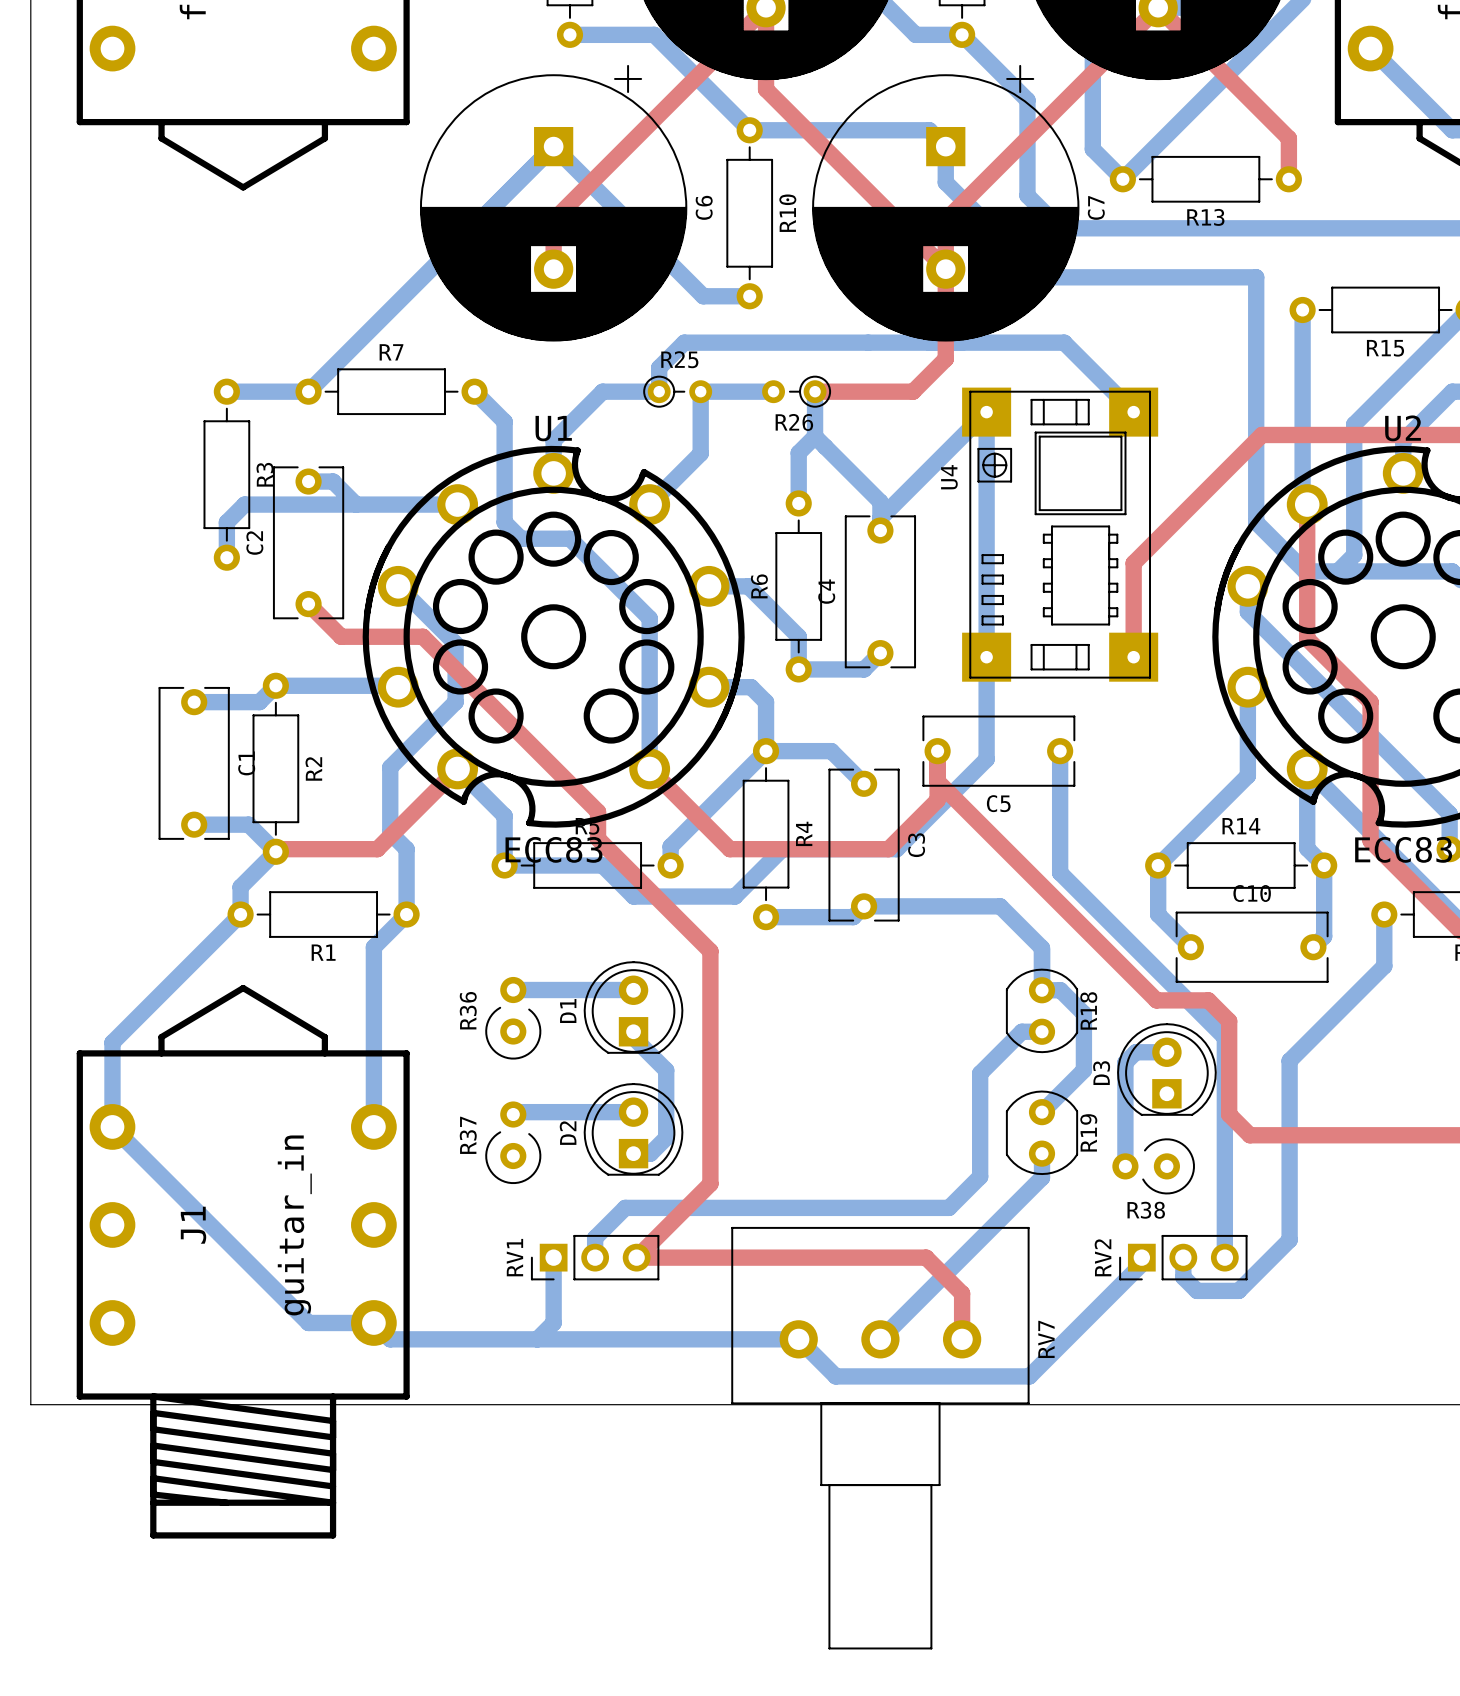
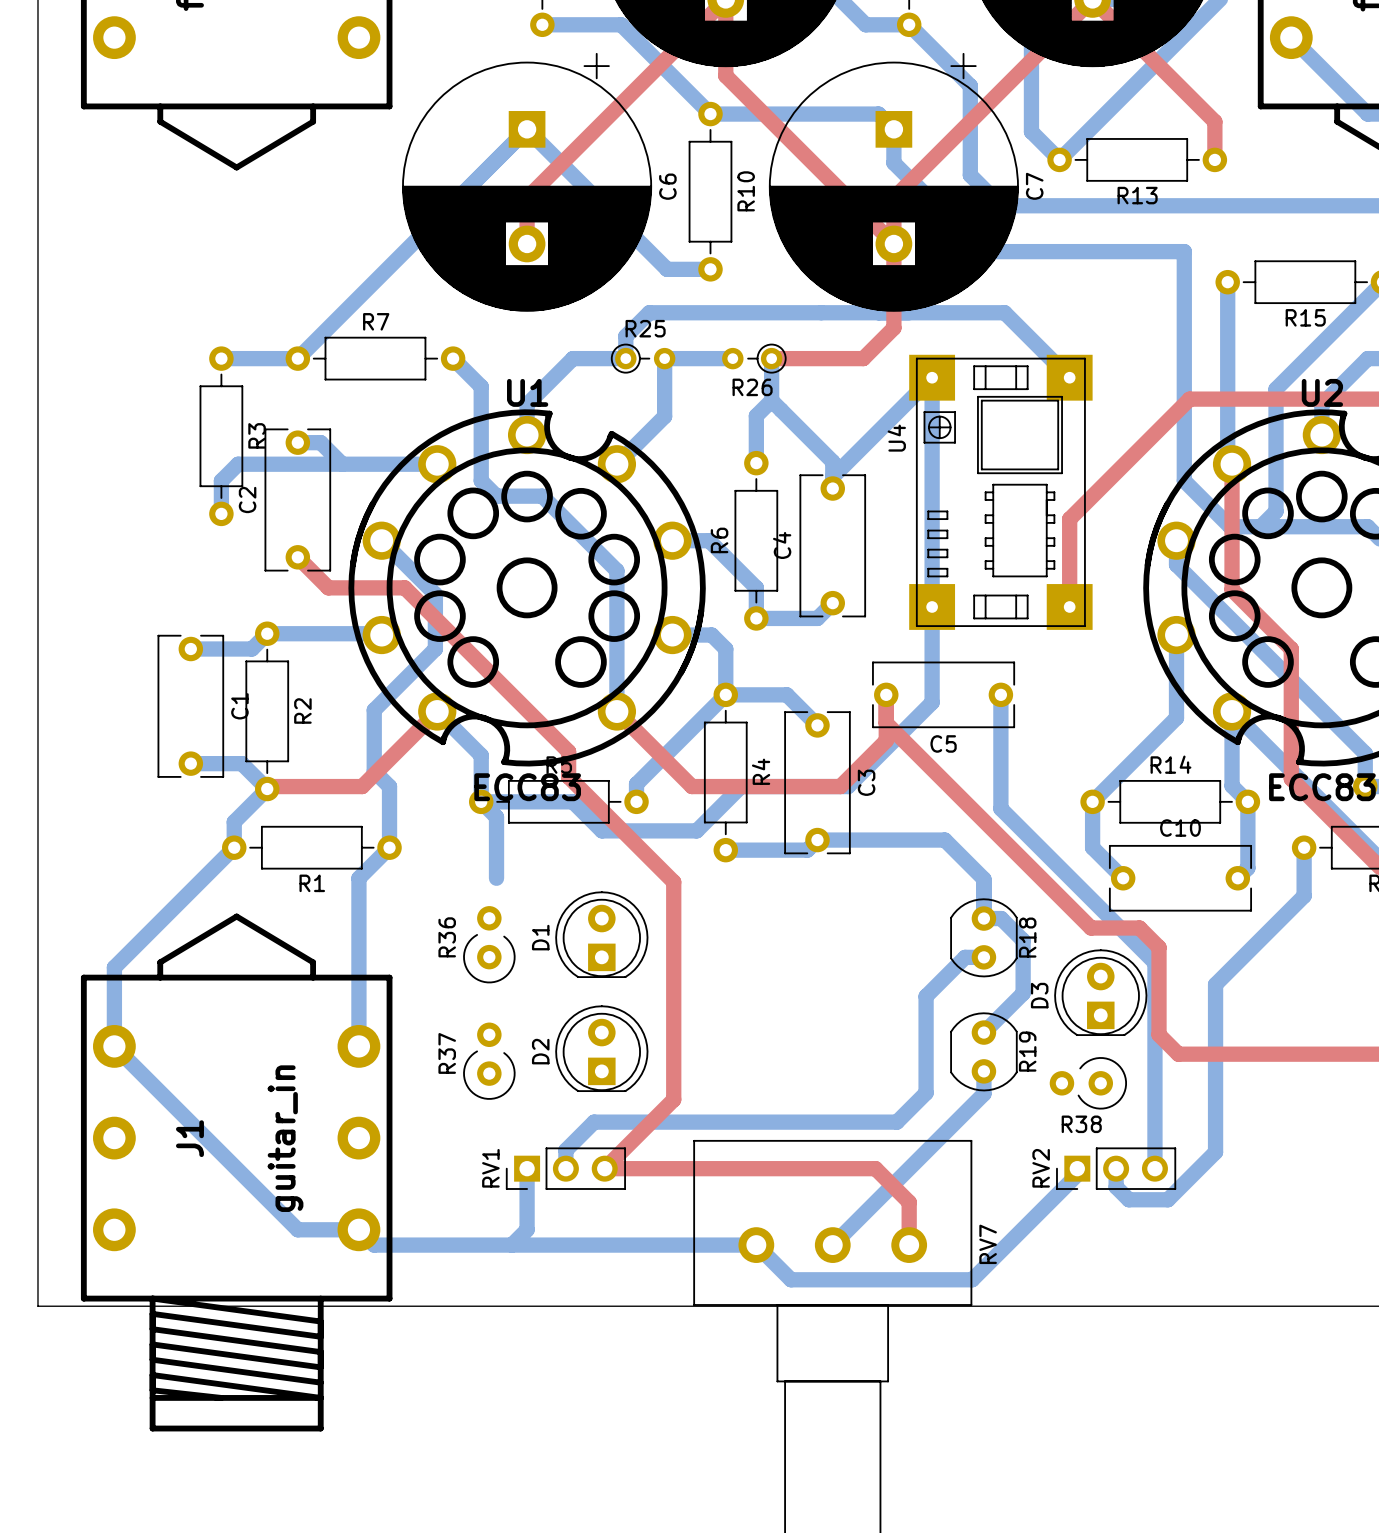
bottom track: none -> (481, 801) (496, 817) (496, 878)
bottom track: (513, 990) (633, 990) -> none
bottom track: (633, 1031) (633, 1037) (666, 1070) (666, 1137) (650, 1153) (633, 1153) -> none
bottom track: (1166, 1052) (1135, 1052) (1125, 1062) (1125, 1166) -> none
bottom track: (633, 1112) (515, 1112) (513, 1114) -> none

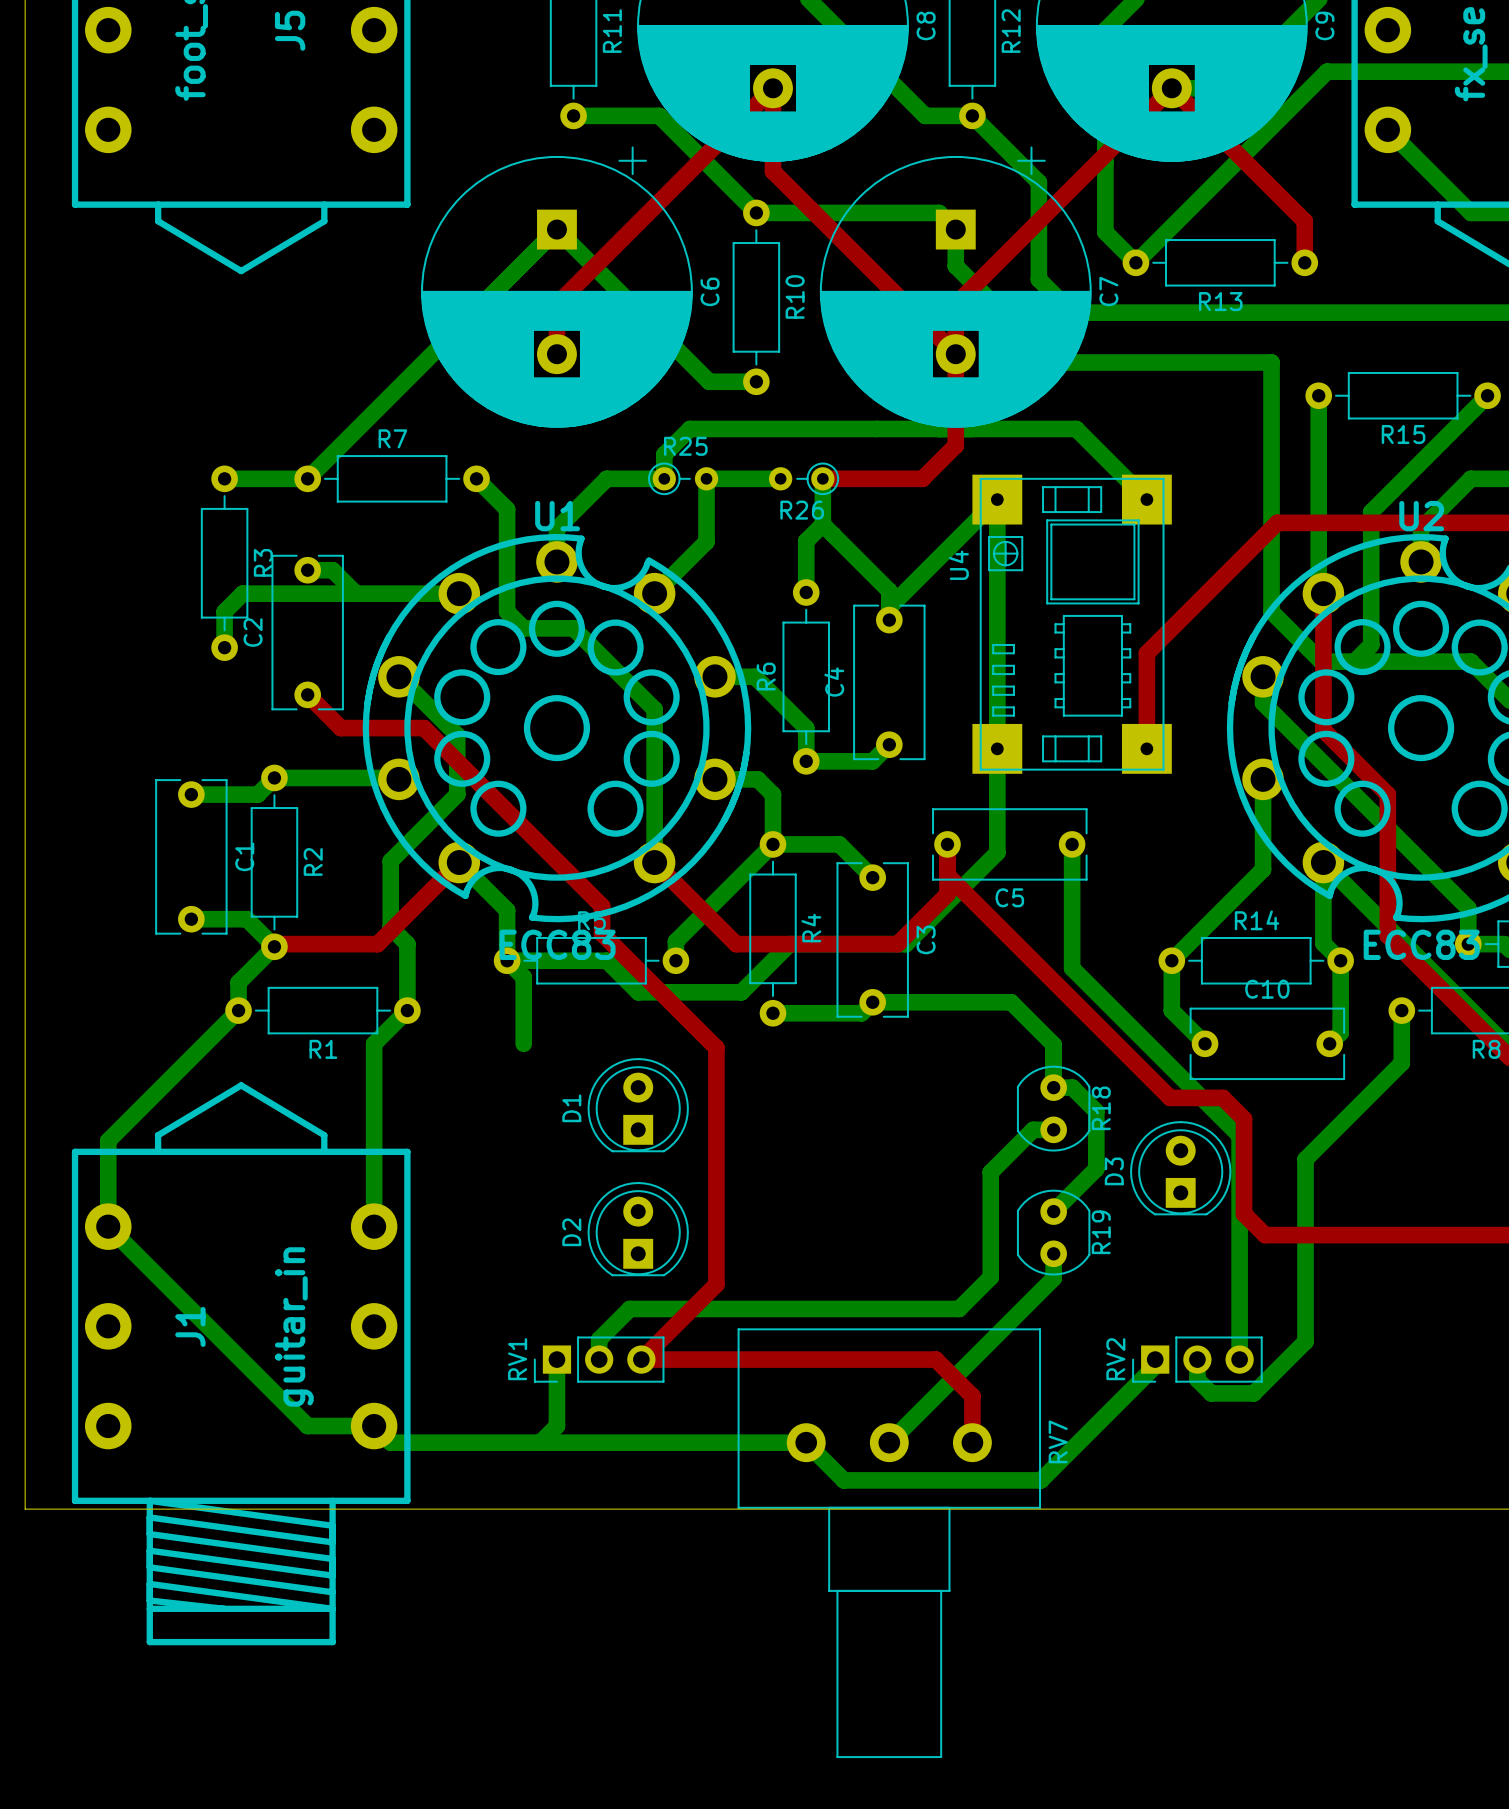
R36: (489, 944) -> none
R37: (489, 1061) -> none
R38: (1088, 1083) -> none

